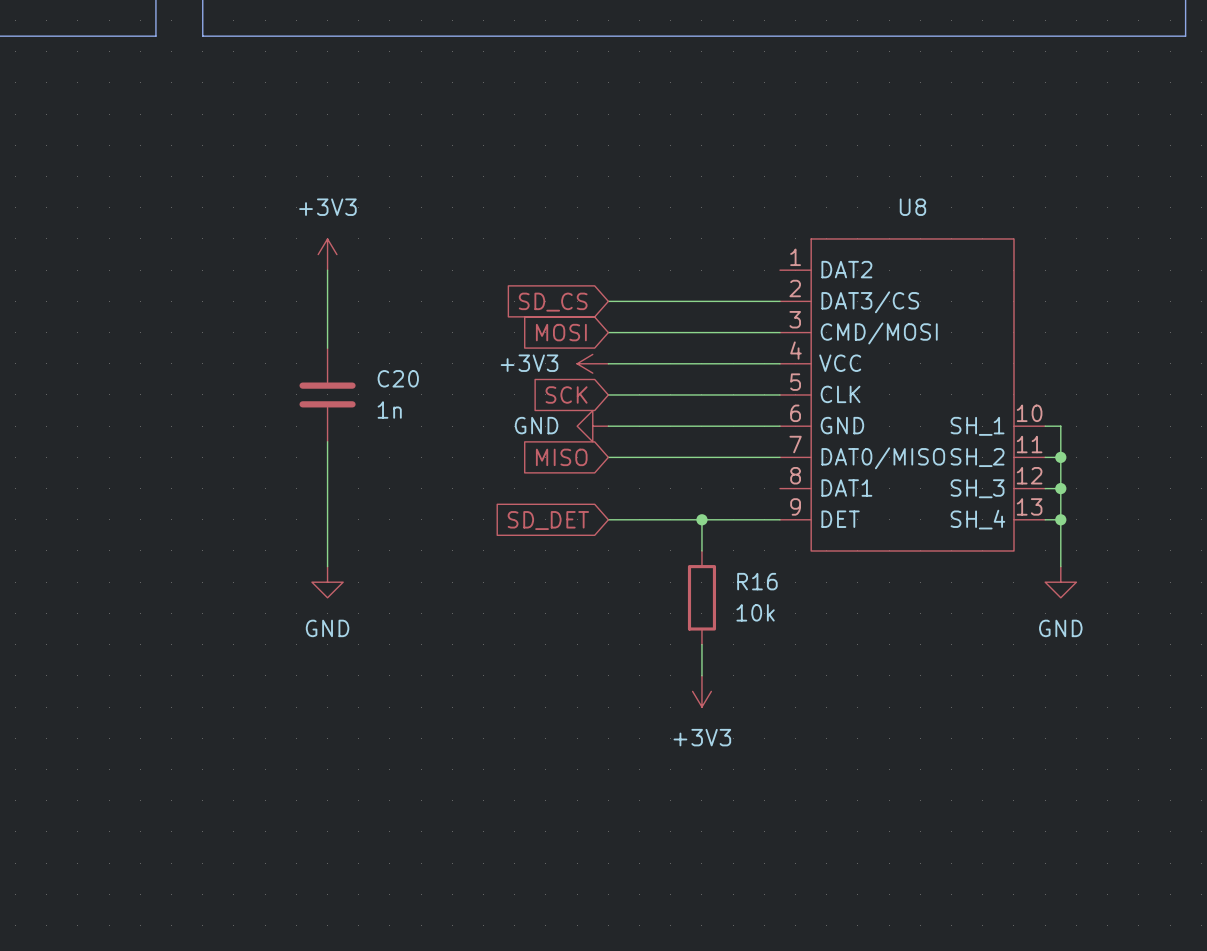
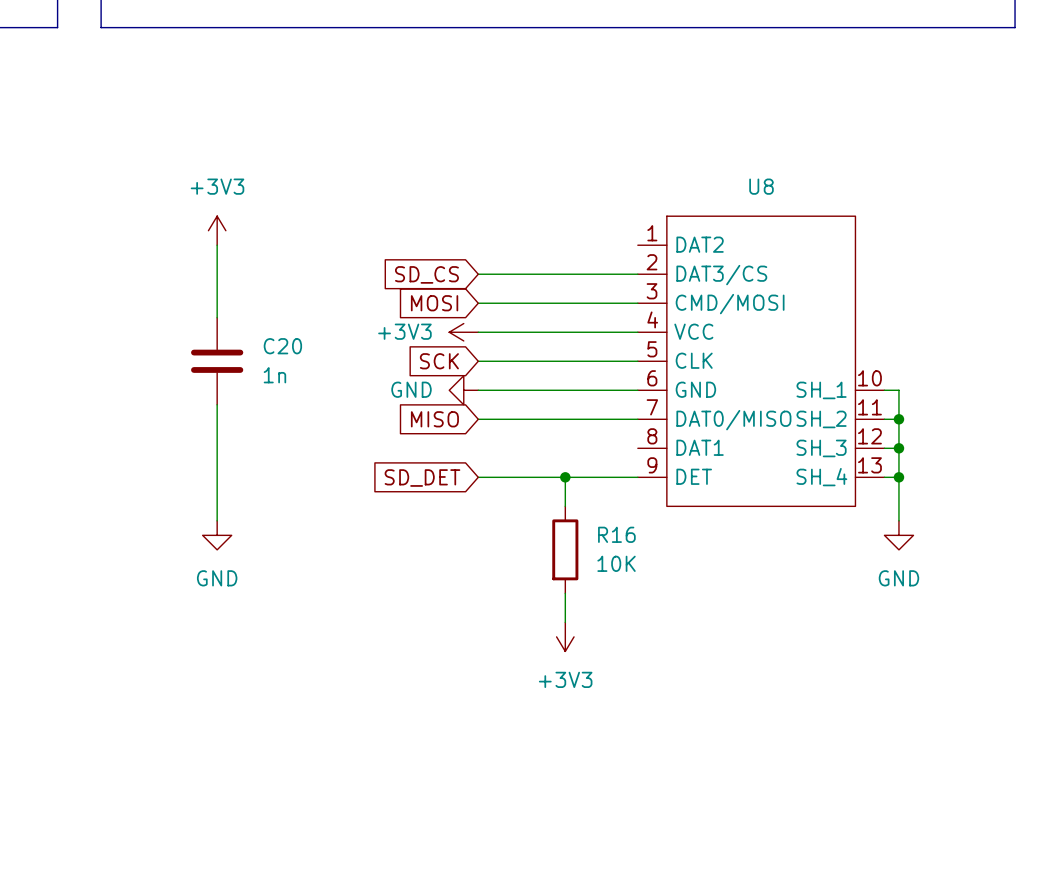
R16 value: 10k (755, 612) -> 10K (616, 563)

